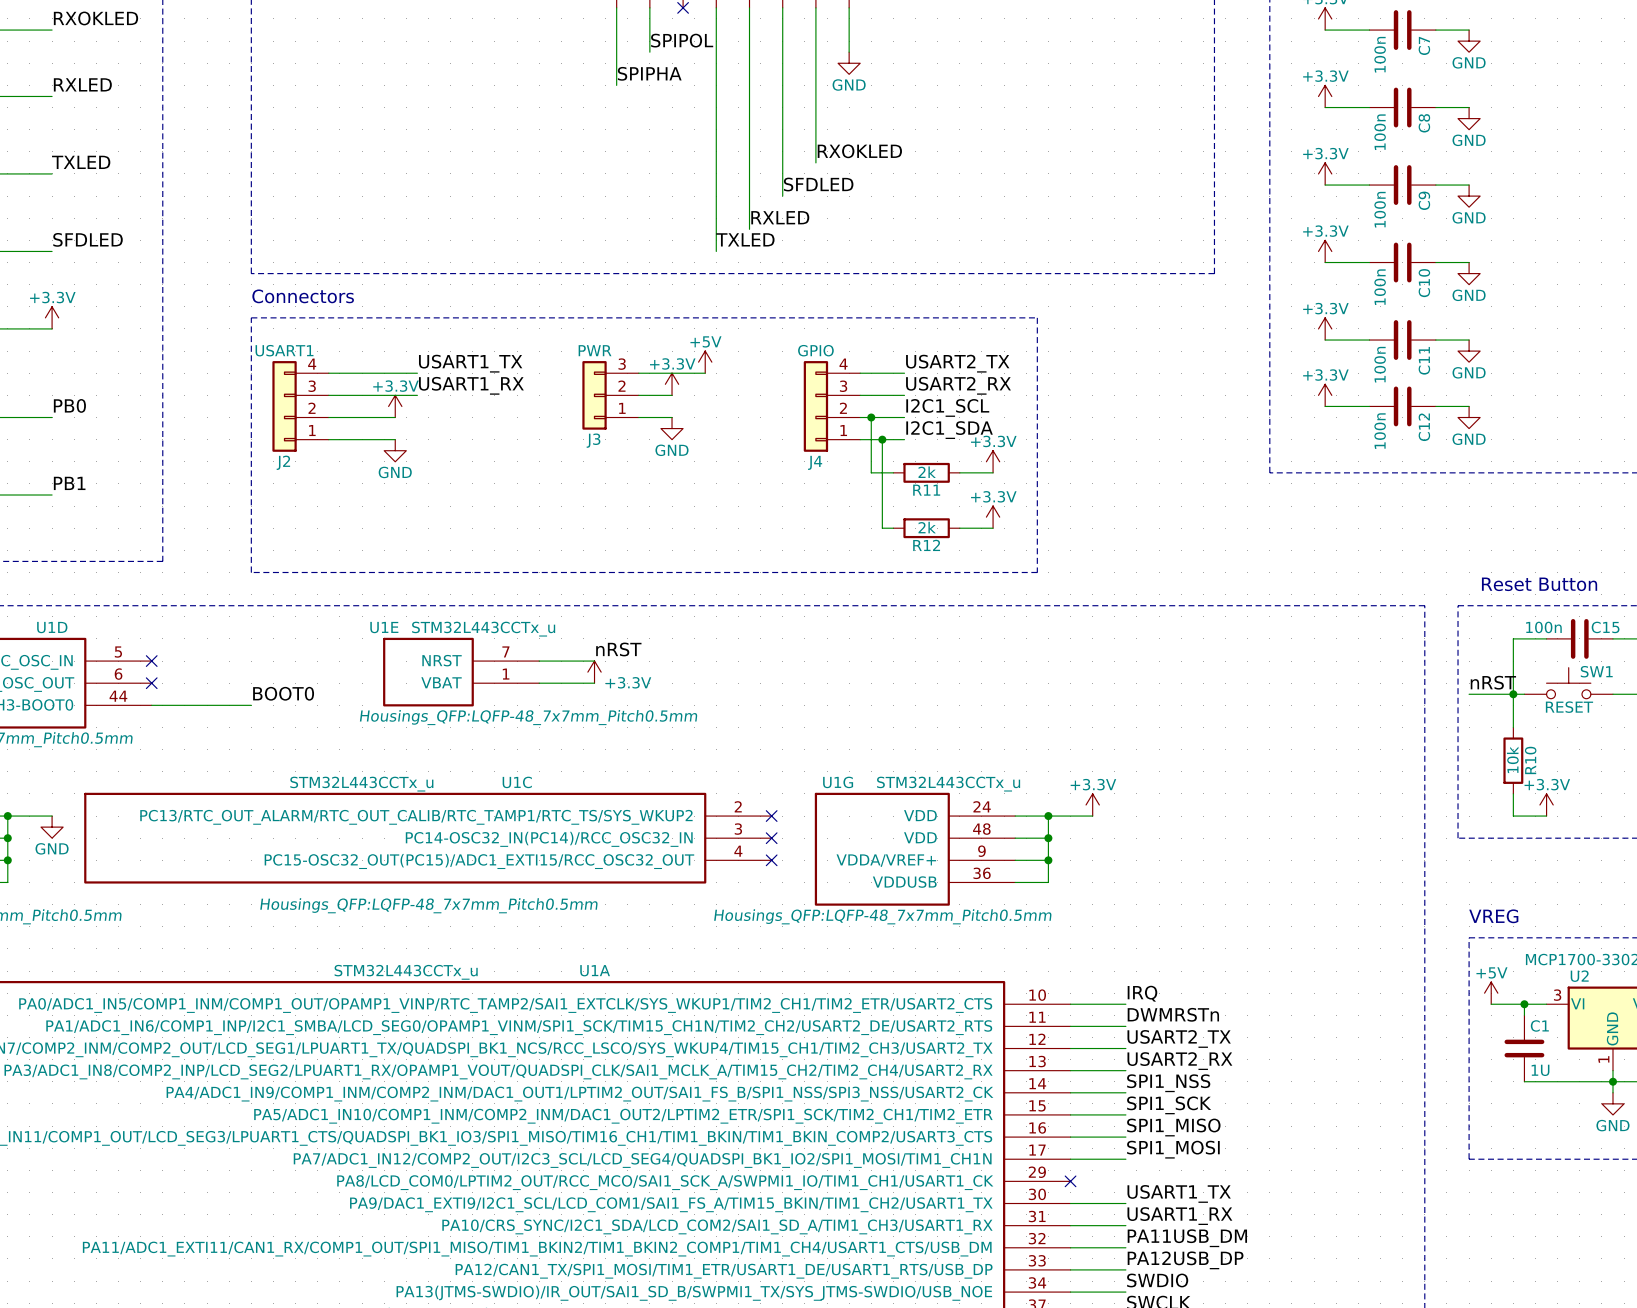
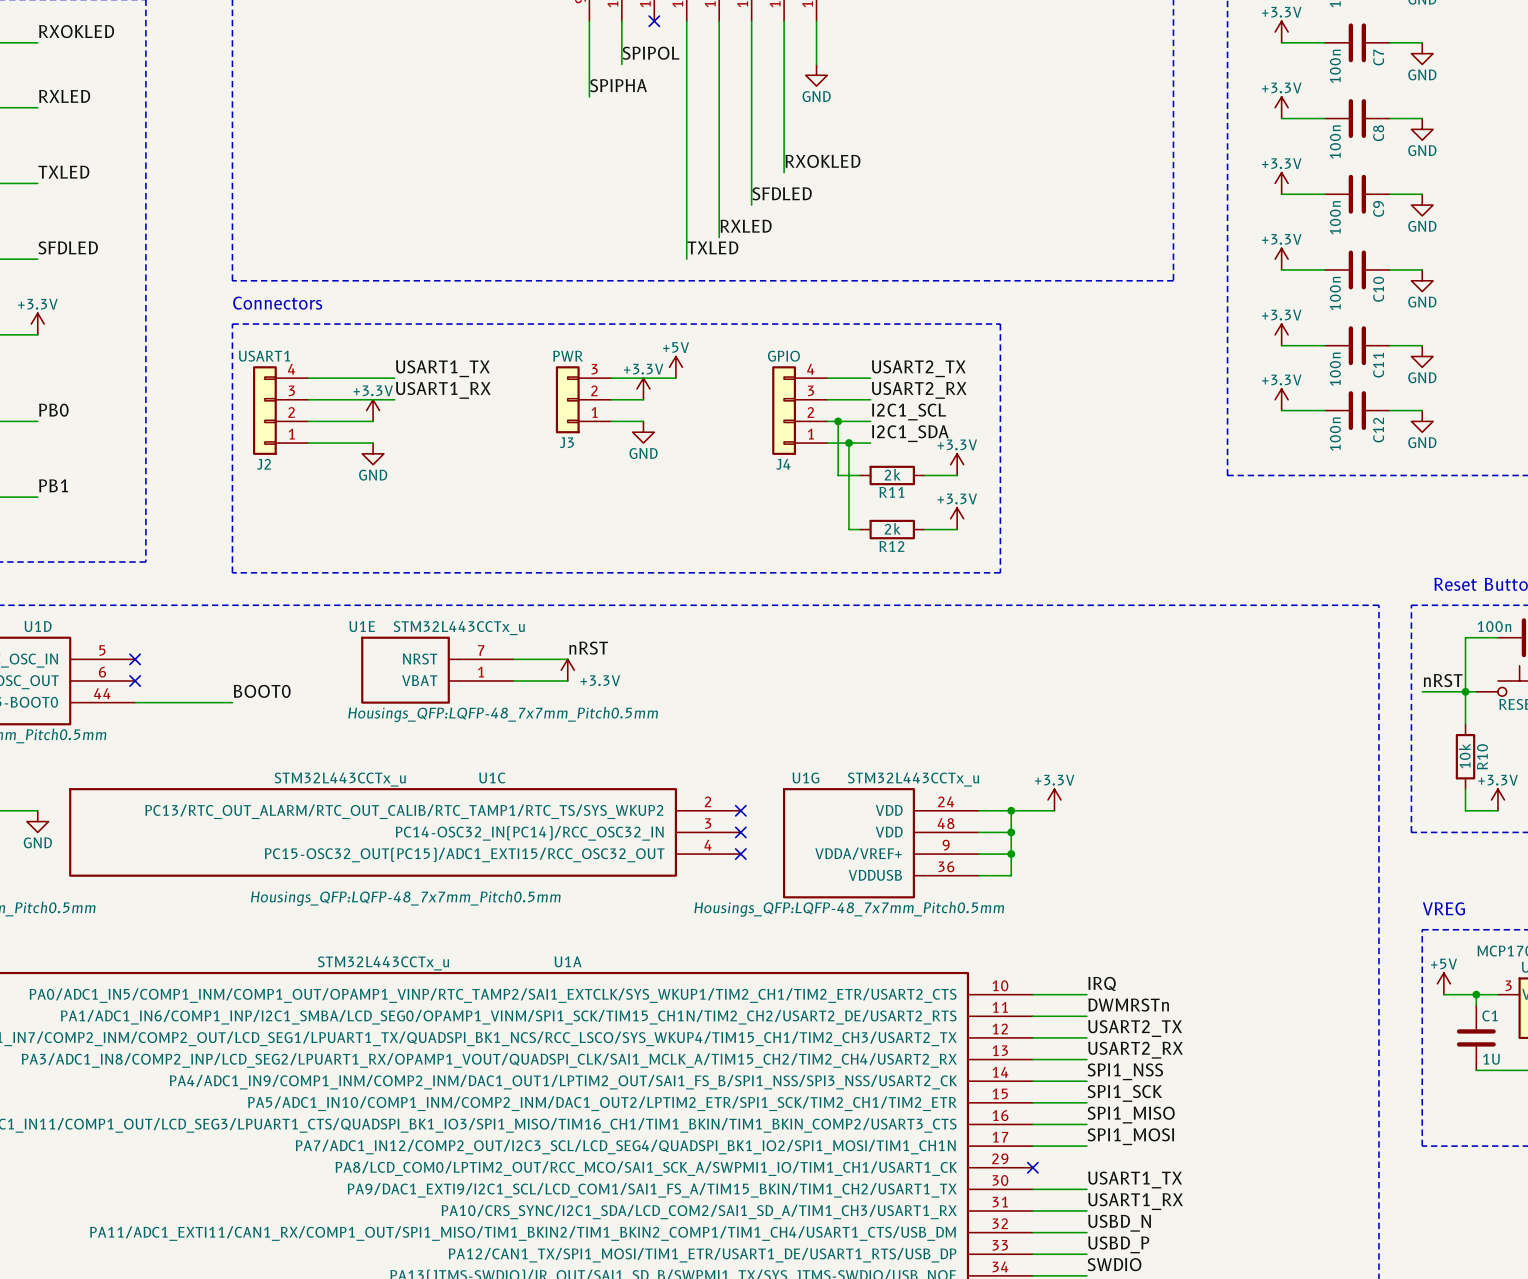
label: PA11USB_DM (1187, 1238) -> USBD_N (1119, 1223)
label: PA12USB_DP (1185, 1260) -> USBD_P (1118, 1244)

